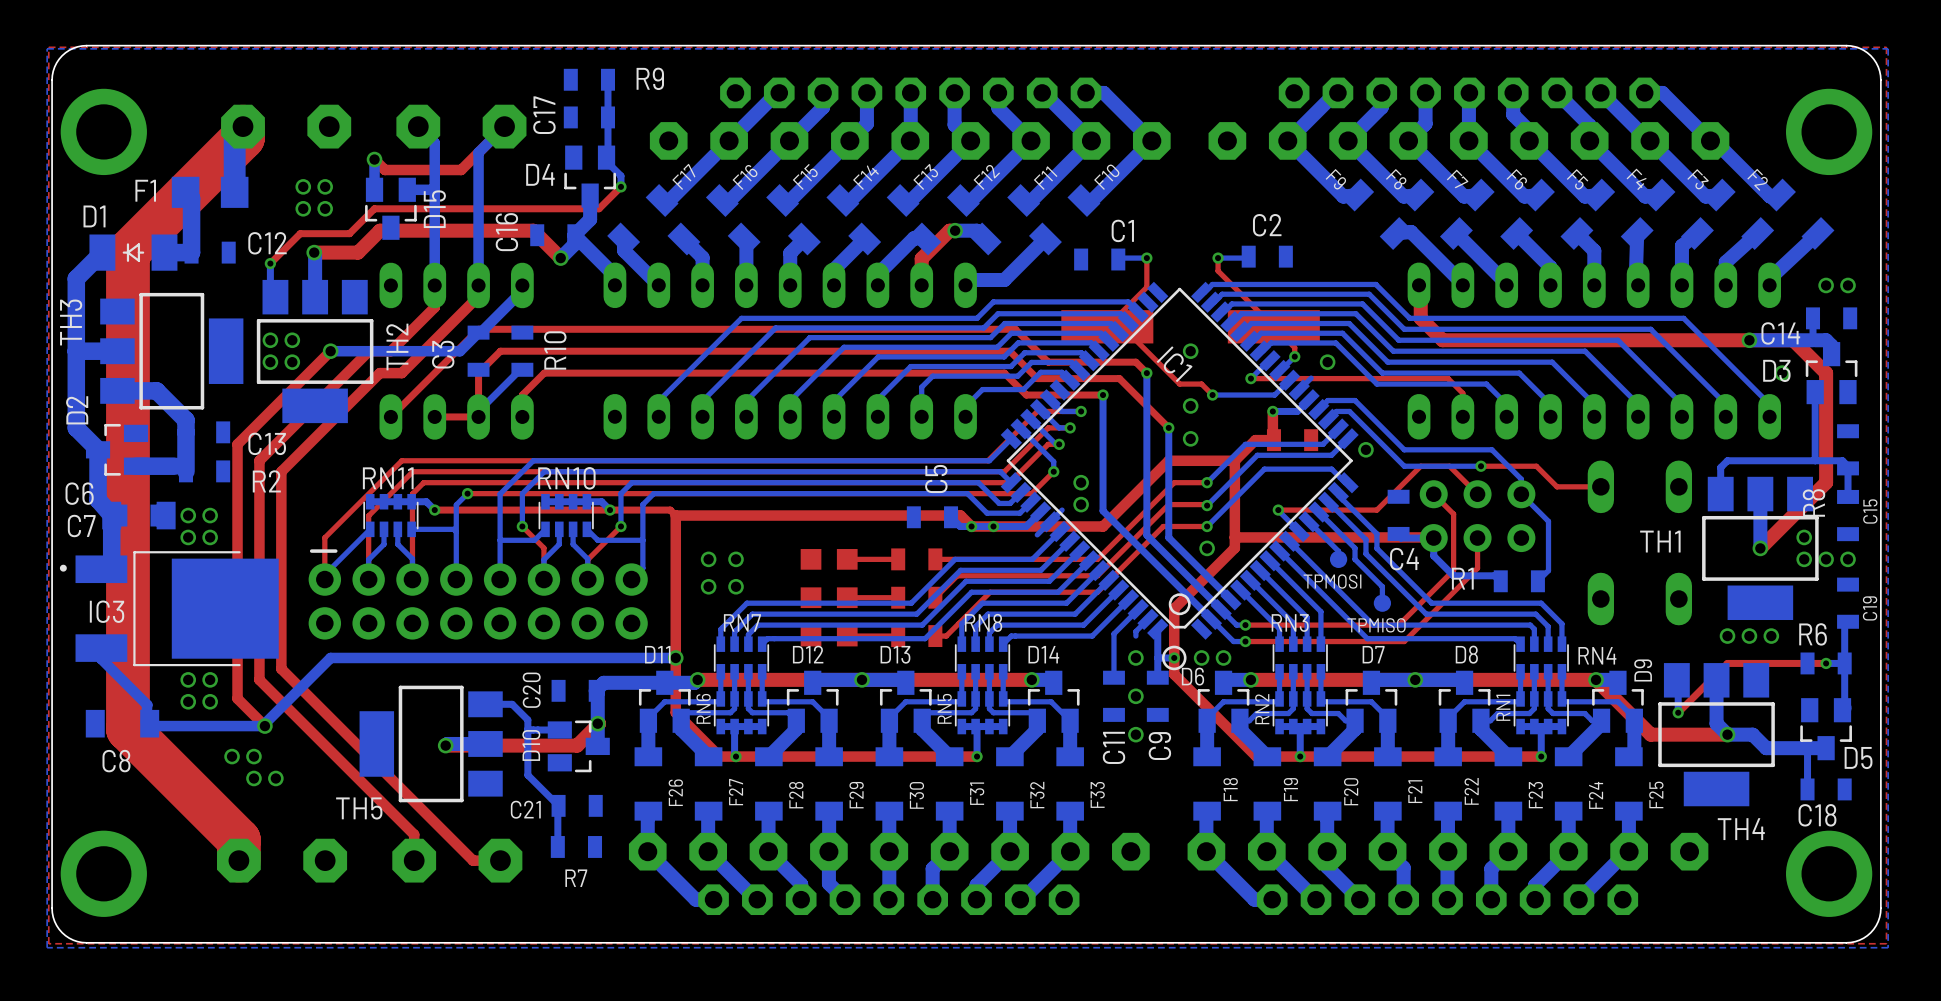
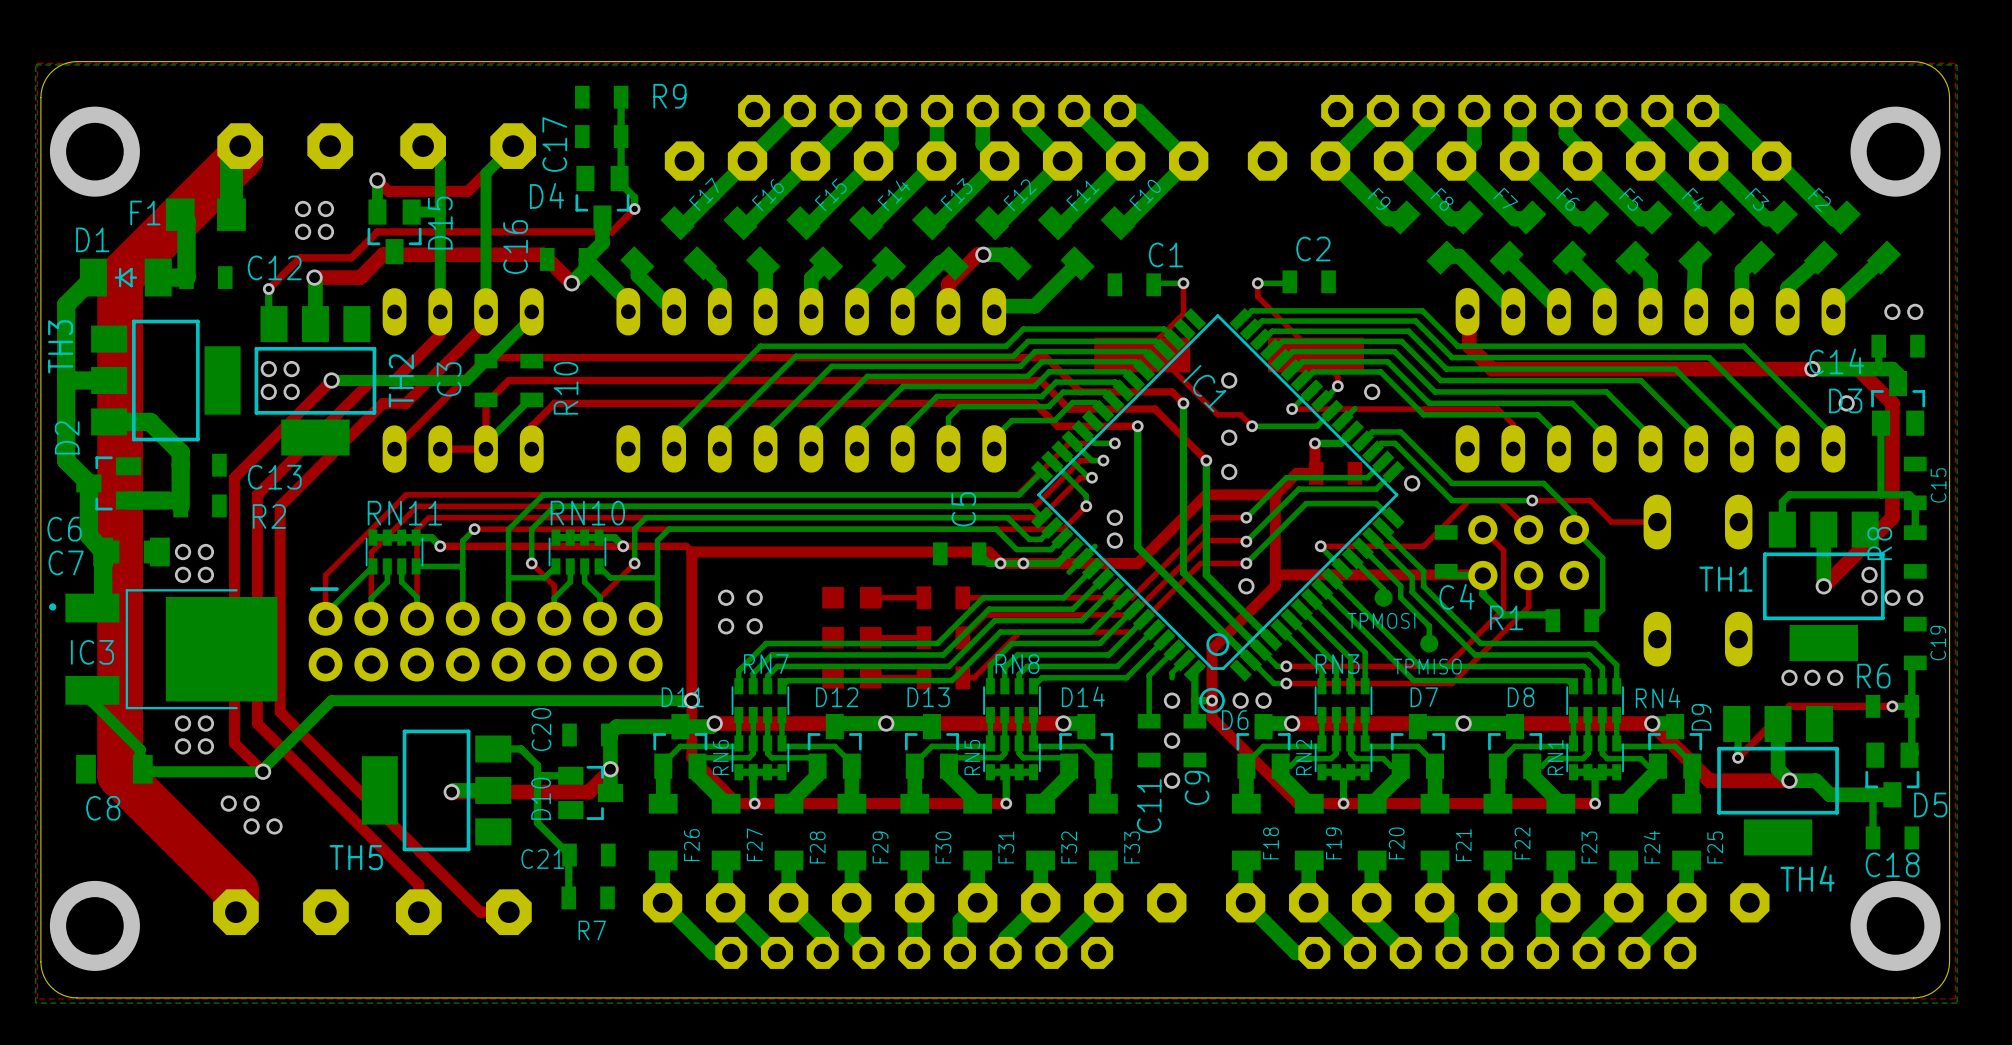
C15 name position: C15 (1870, 511) -> C15 (1938, 485)

